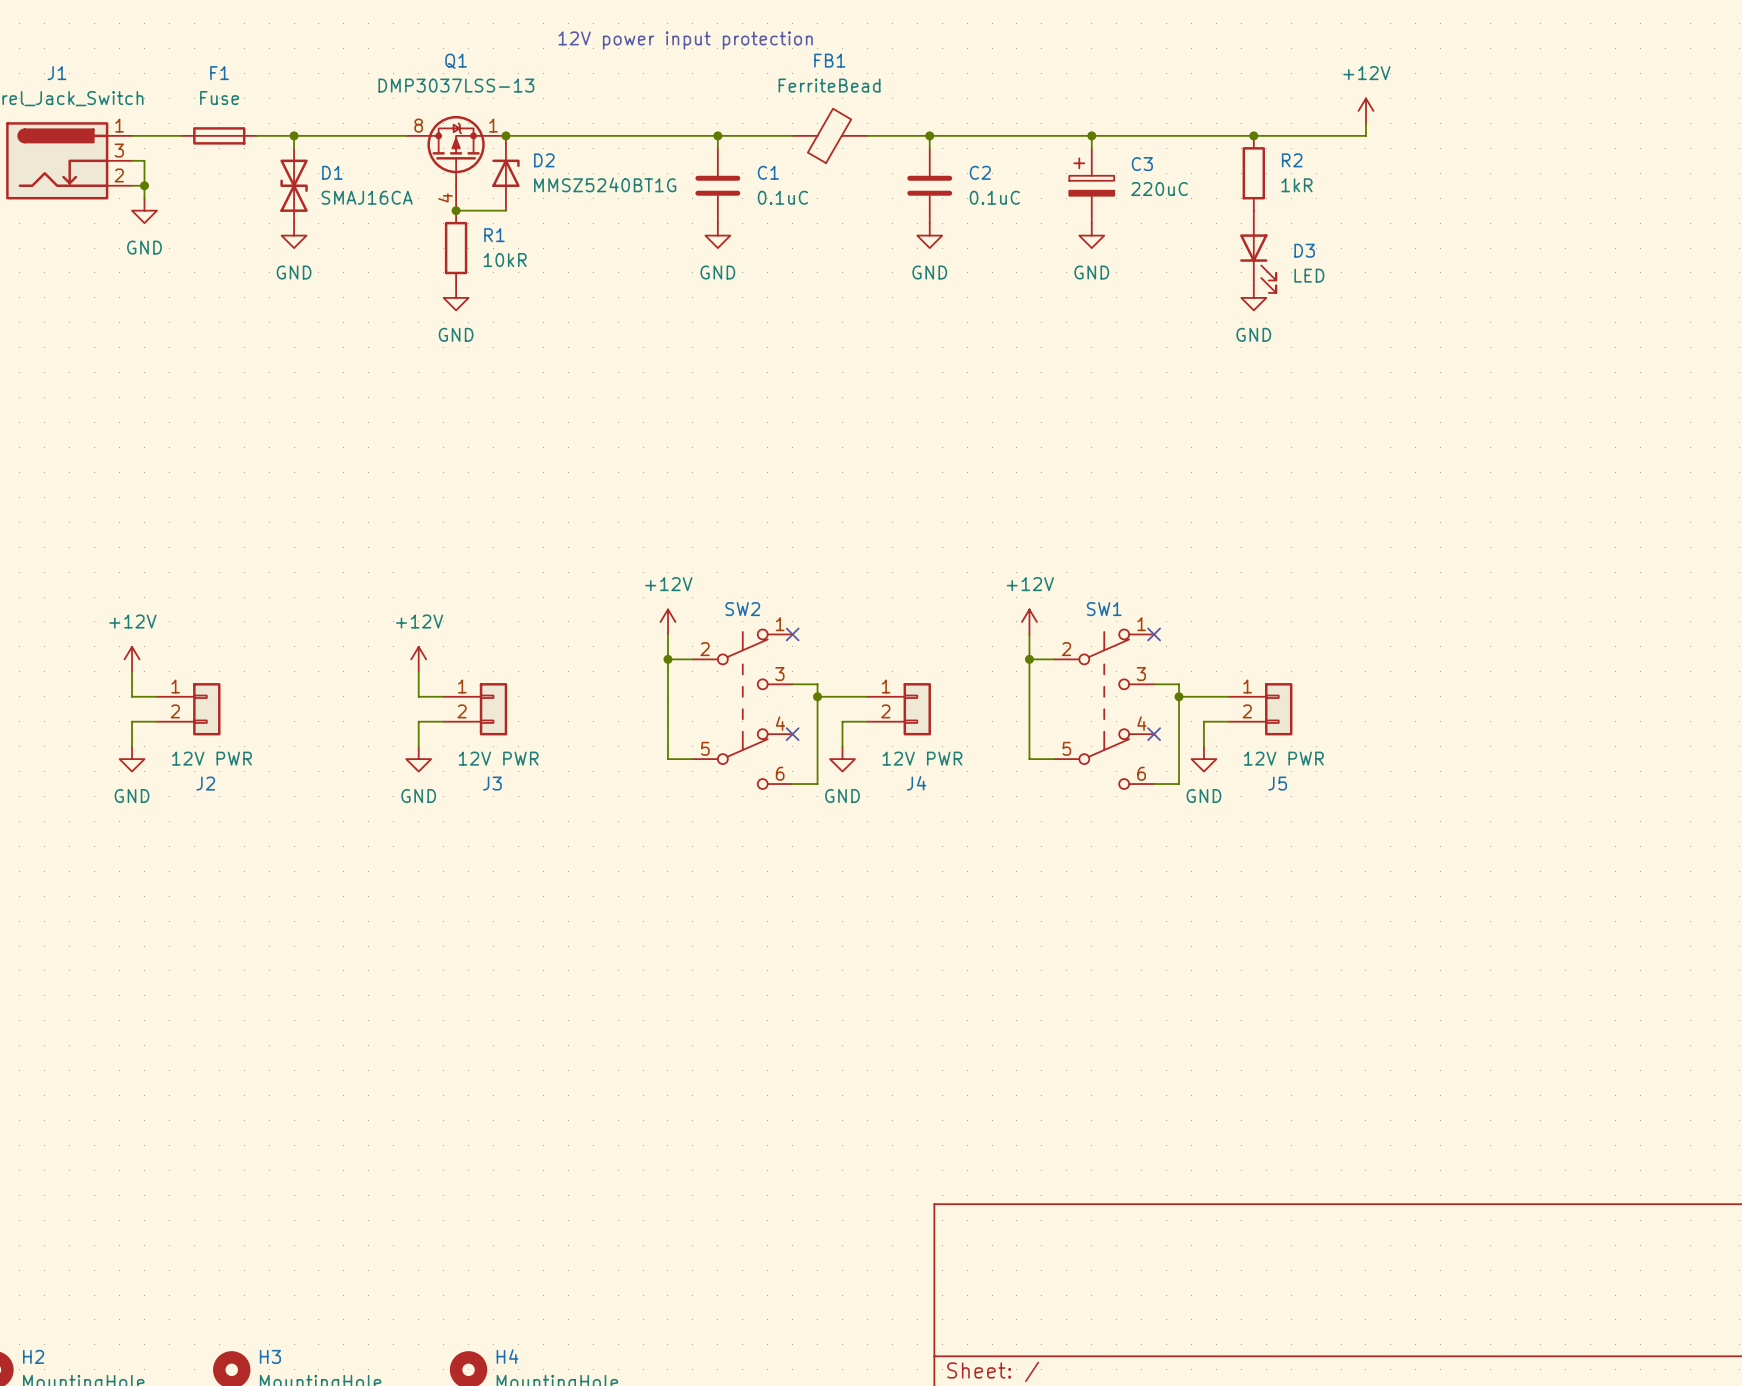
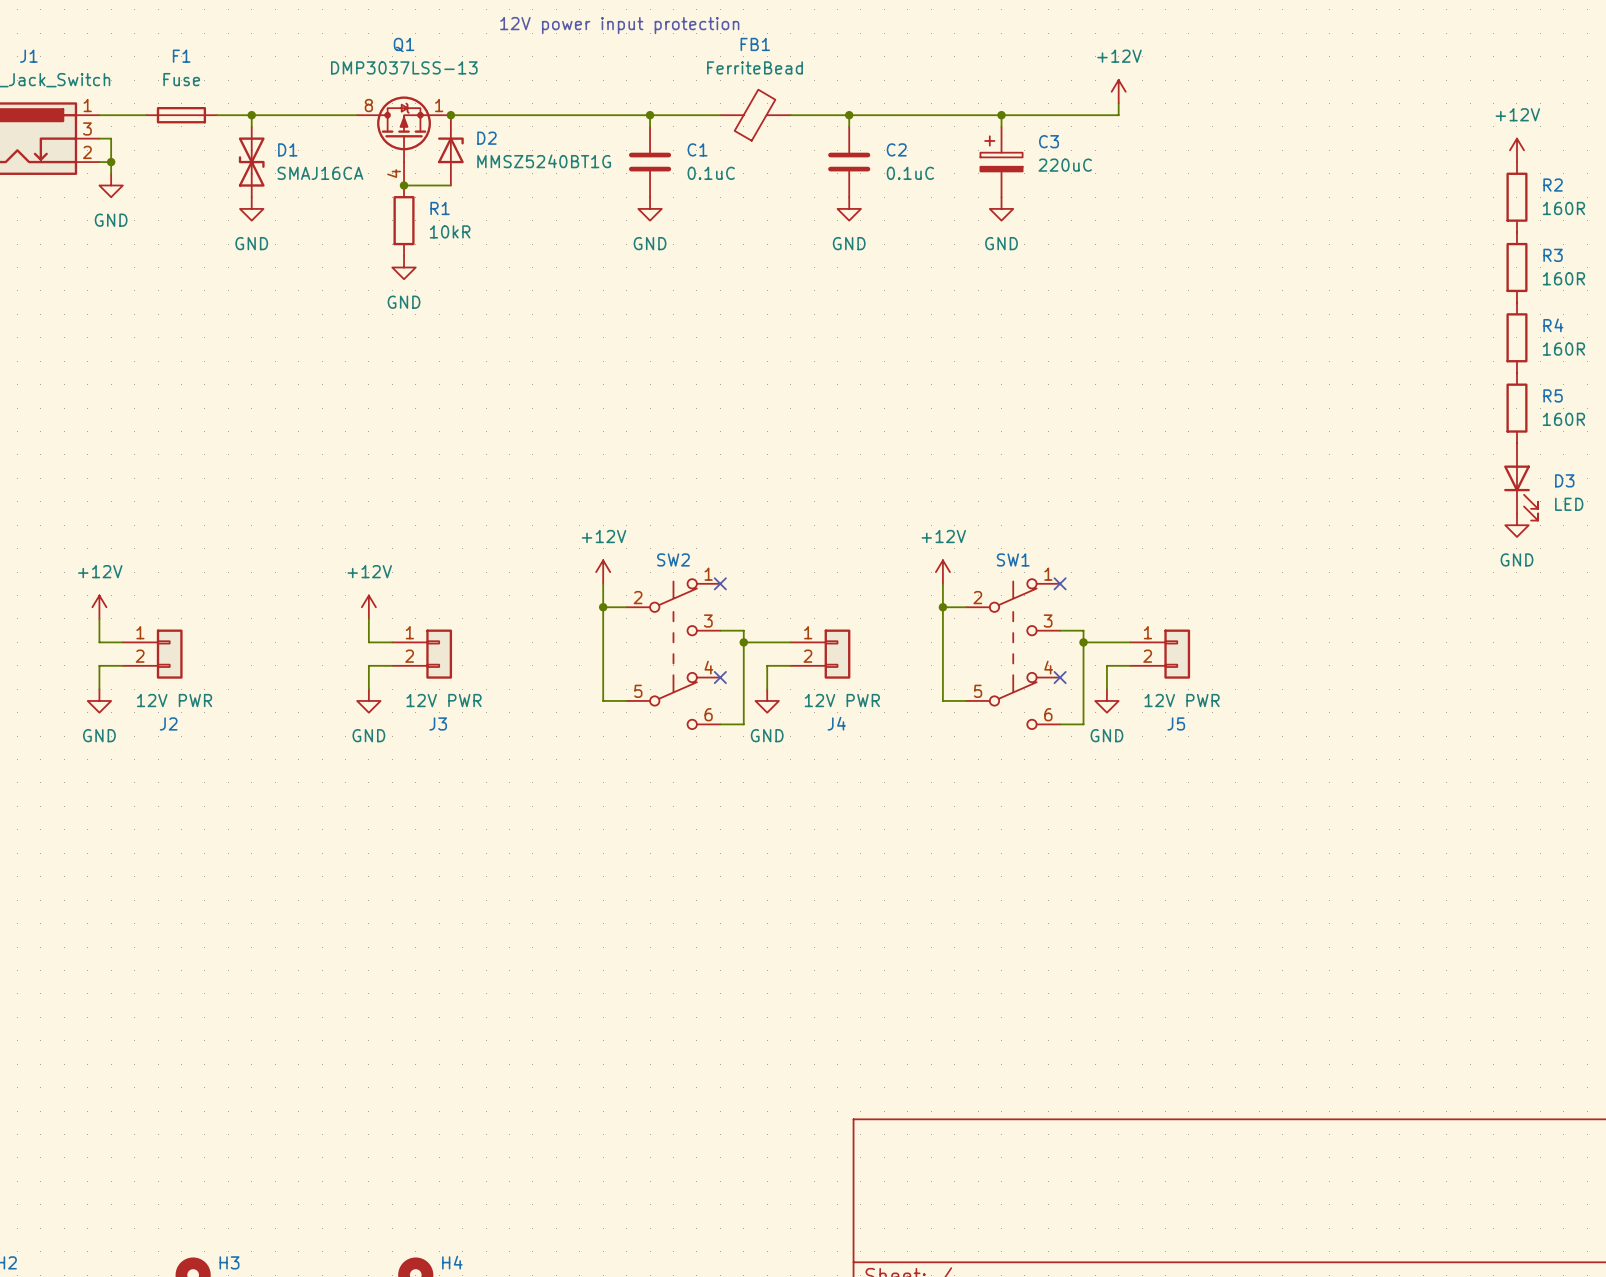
power symbol: none -> +12V (1118, 91)
power symbol: +12V (1365, 110) -> none
wire: (1365, 123) (1365, 135) (1216, 135) -> (1118, 103) (1118, 115)
junction: (1253, 135) -> none
R2 position: (1253, 173) -> (1516, 197)
power symbol: none -> +12V (1516, 150)
R2 value: 1kR (1296, 185) -> 160R (1563, 208)
D3 position: (1258, 251) -> (1521, 481)
power symbol: GND (1253, 297) -> none
R3: none -> 160R (1516, 267)
R4: none -> 160R (1516, 337)
R5: none -> 160R (1516, 408)
power symbol: none -> GND (1516, 525)

